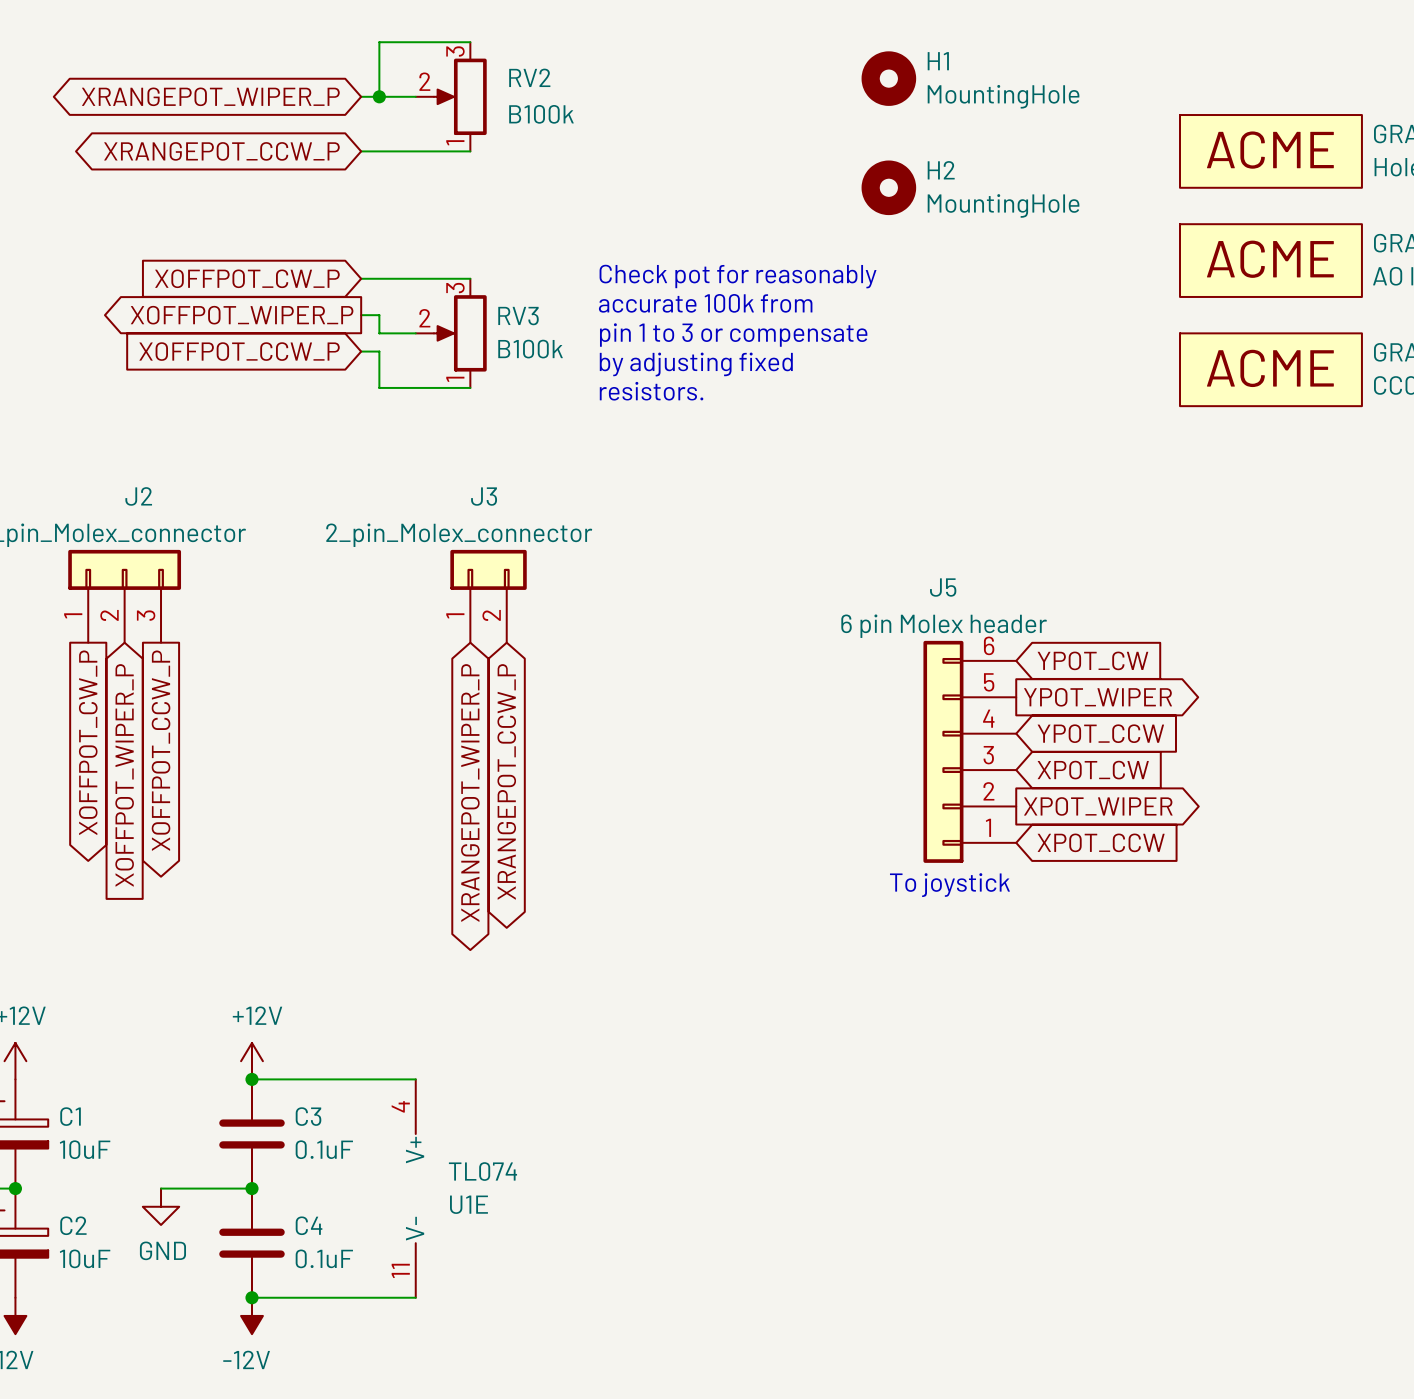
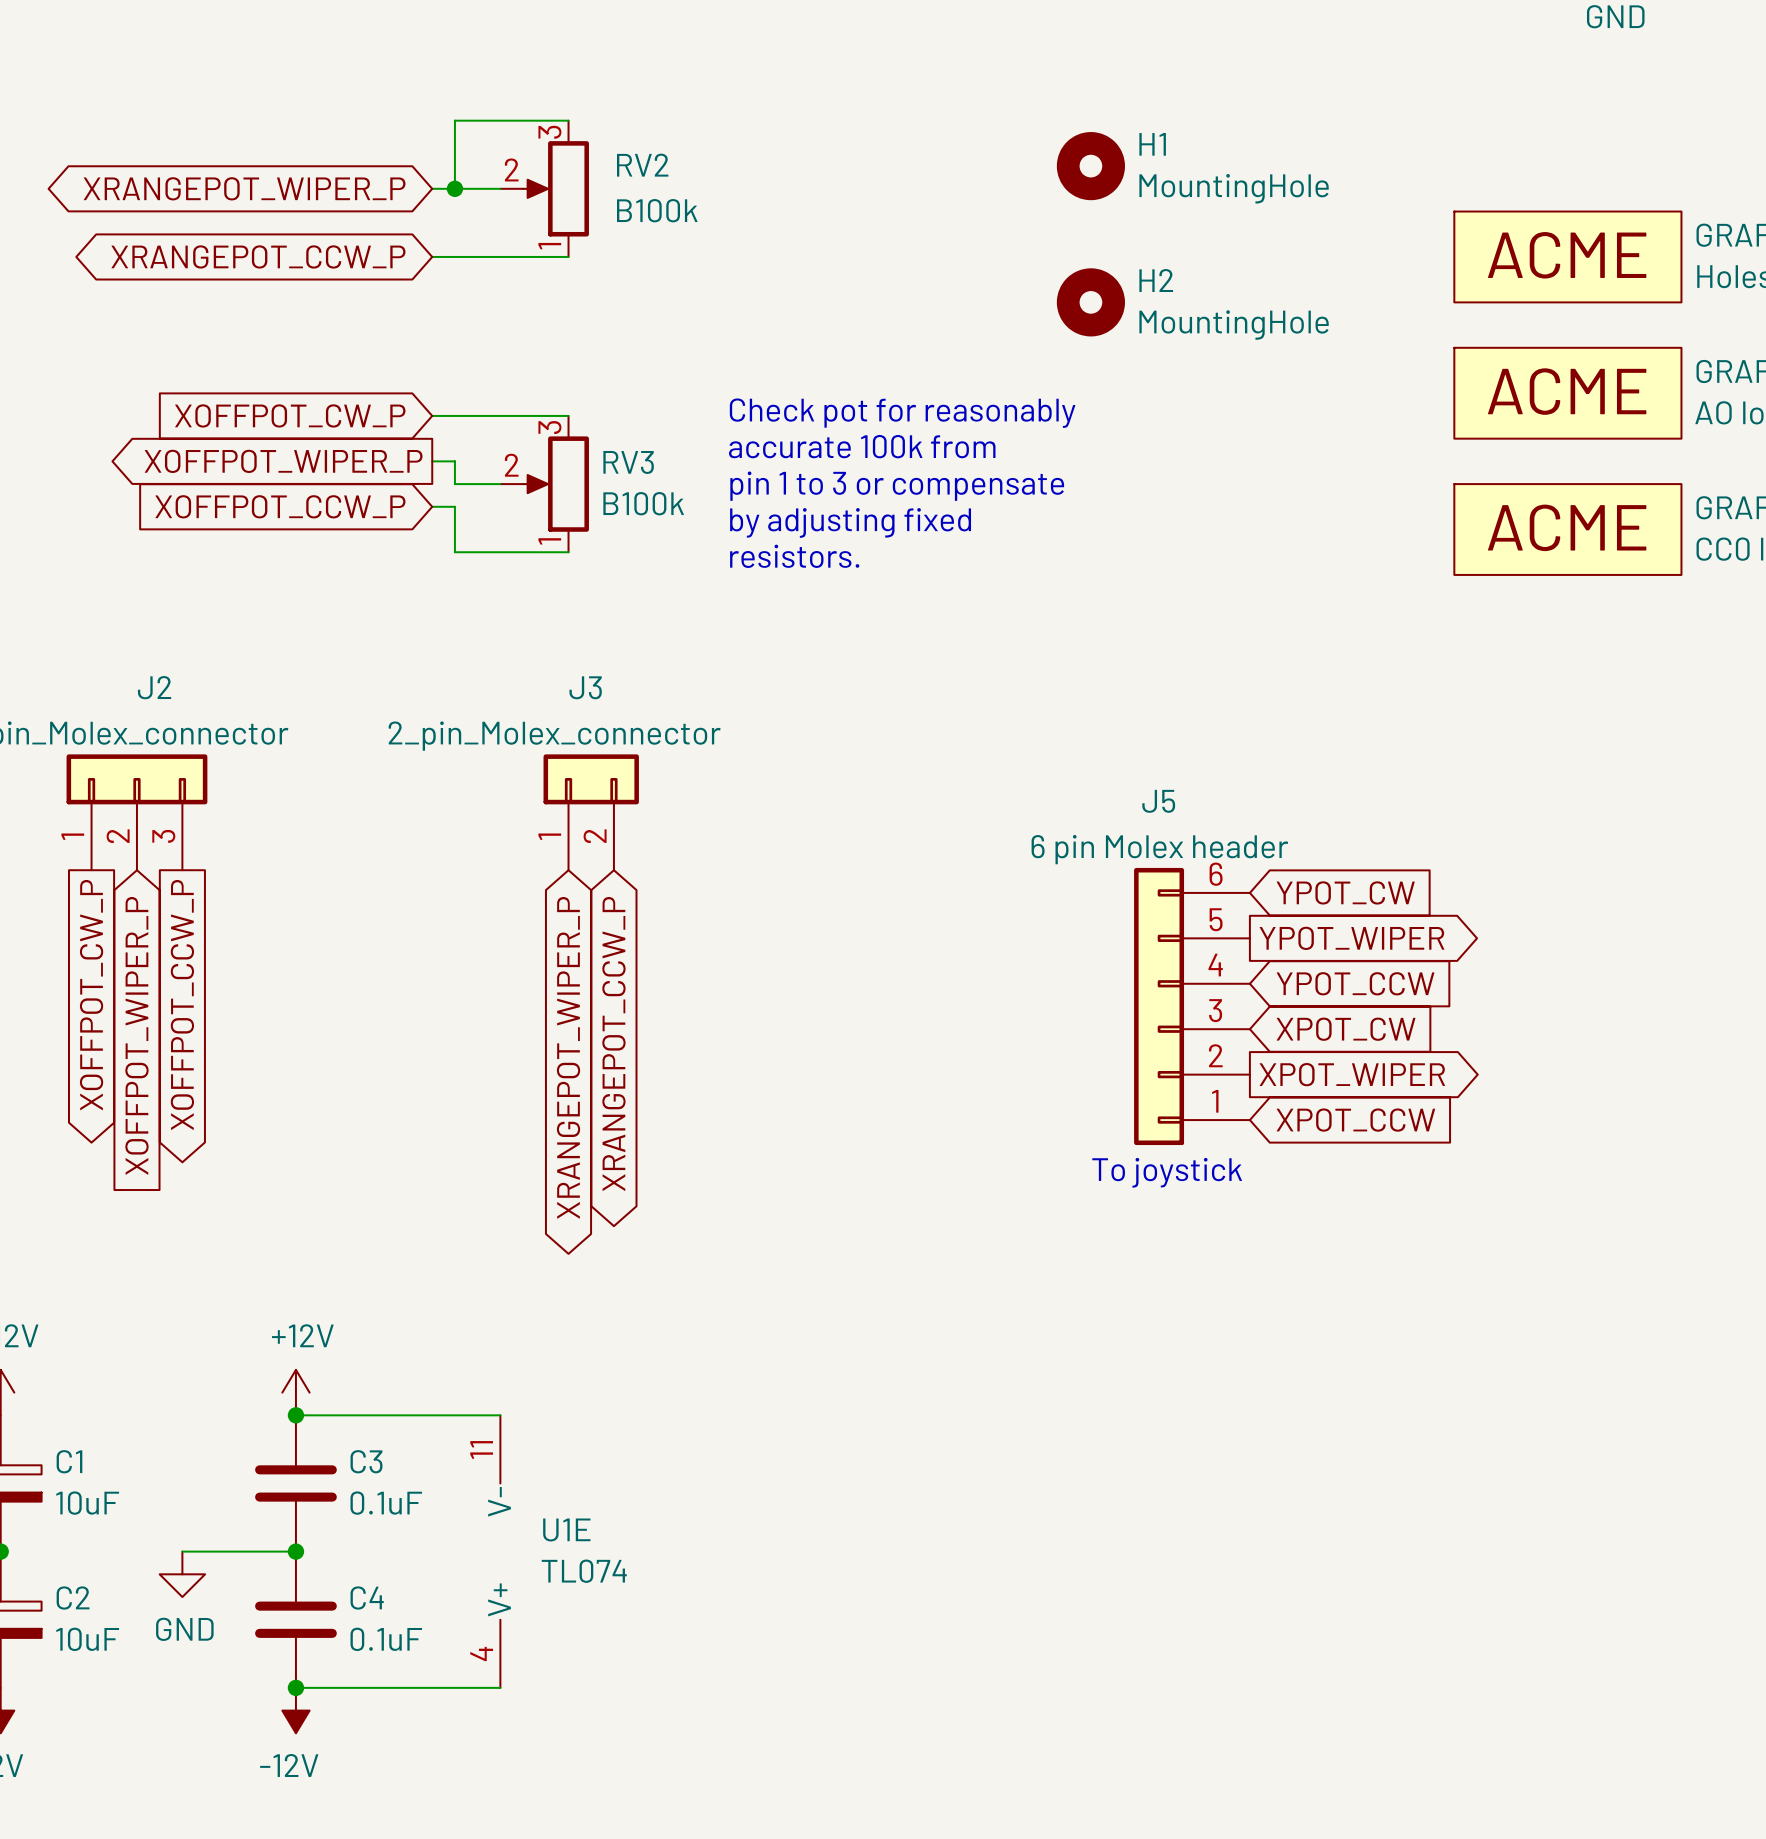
U1E value position: TL074 (482, 1171) -> TL074 (584, 1571)
U1E rotation: 0° (415, 1188) -> 180° (500, 1551)
U1E name position: U1E (468, 1204) -> U1E (566, 1529)

